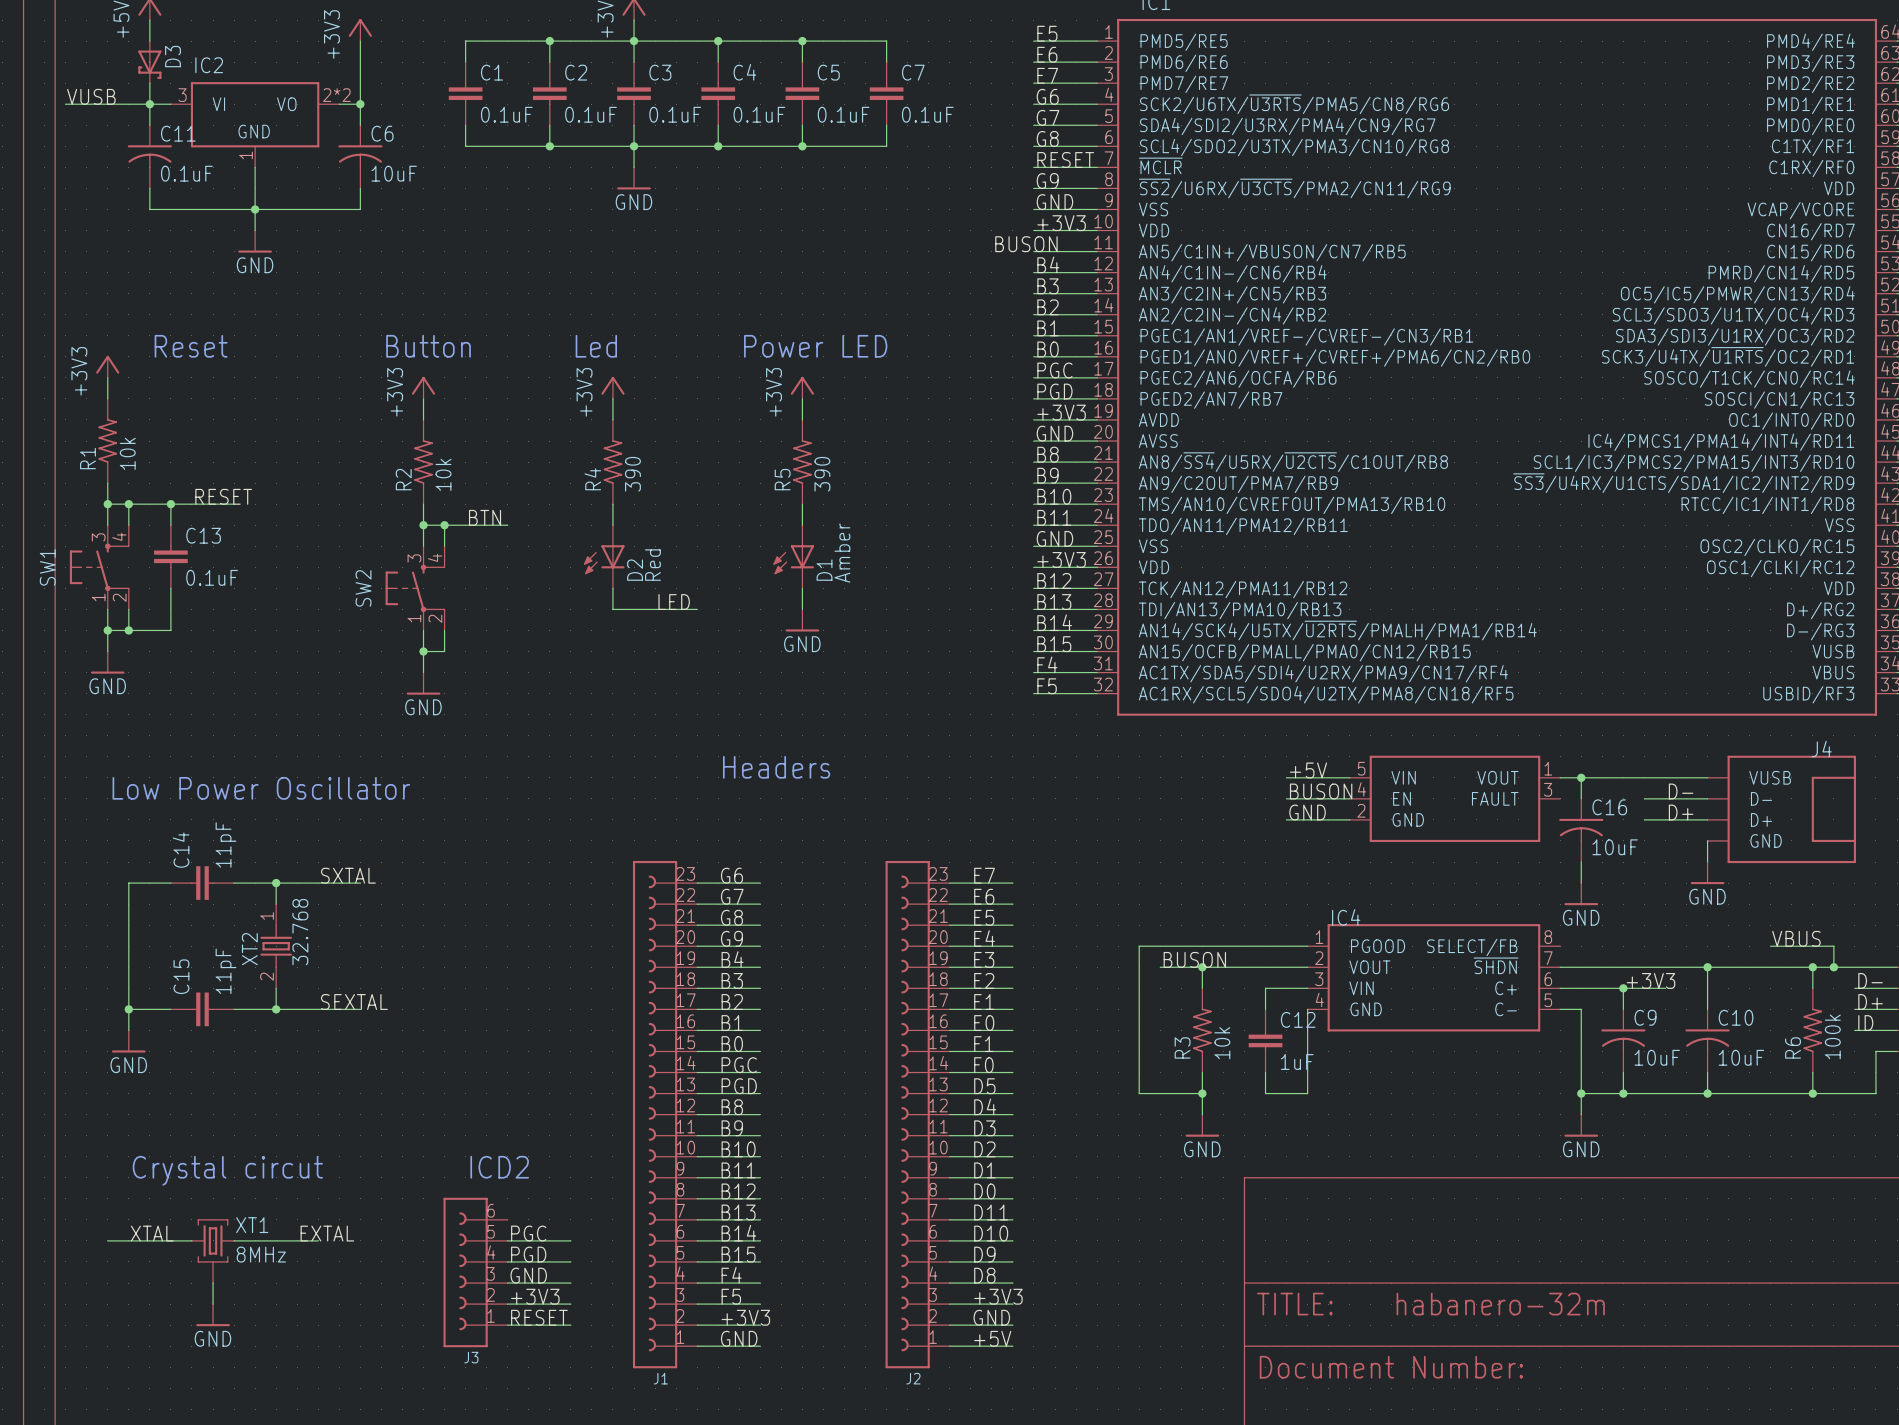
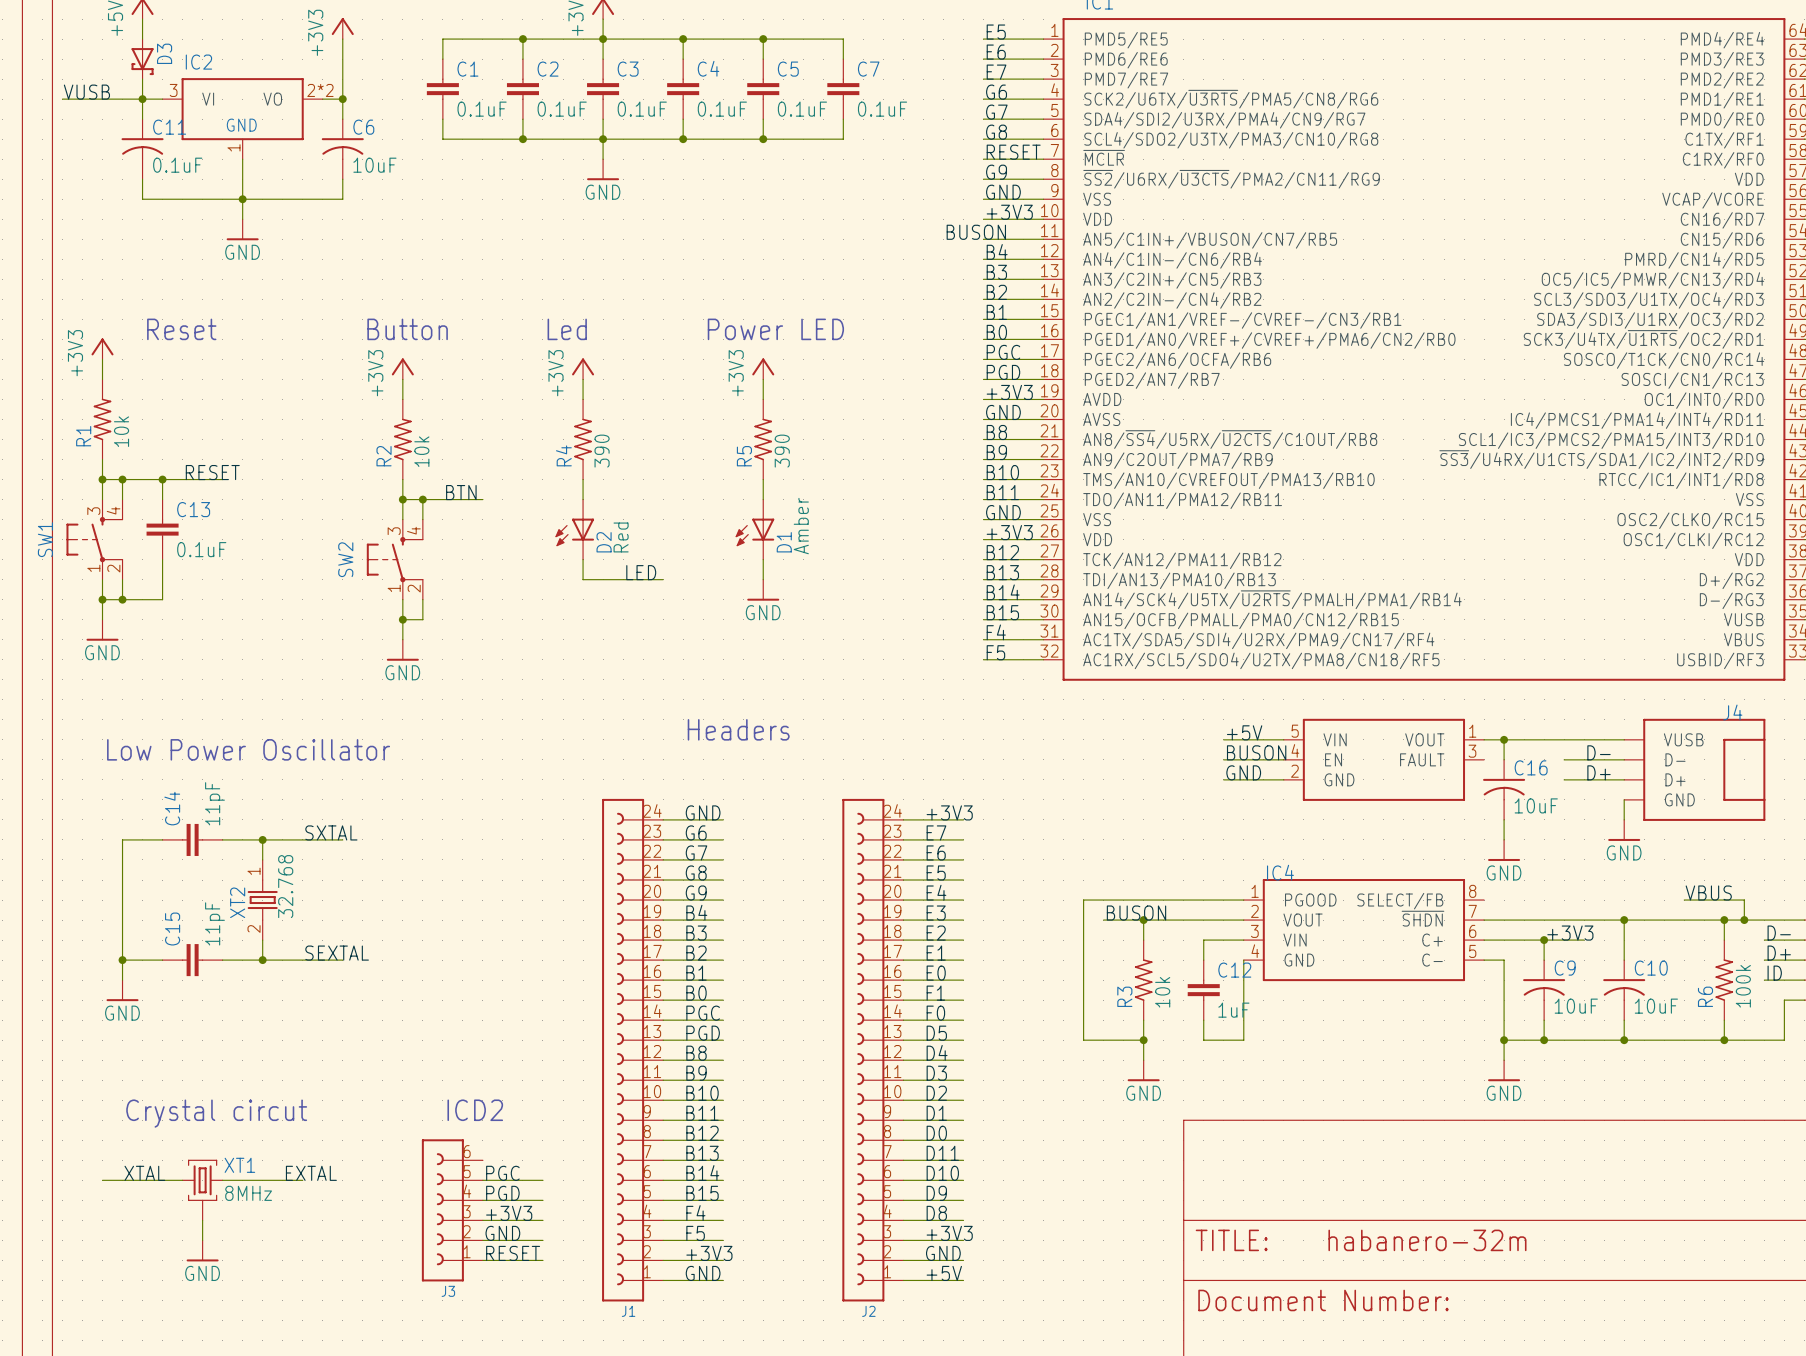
label: none -> GND (703, 812)
label: none -> +3V3 (949, 812)
J1 symbol: [632, 860, 698, 1369] -> [602, 798, 664, 1302]
J2 symbol: [885, 860, 950, 1369] -> [842, 798, 904, 1302]
wire: none -> (663, 819) (723, 819)
wire: none -> (903, 819) (963, 819)
label: GND (528, 1275) -> +3V3 (509, 1213)
label: +3V3 (535, 1296) -> GND (502, 1233)

